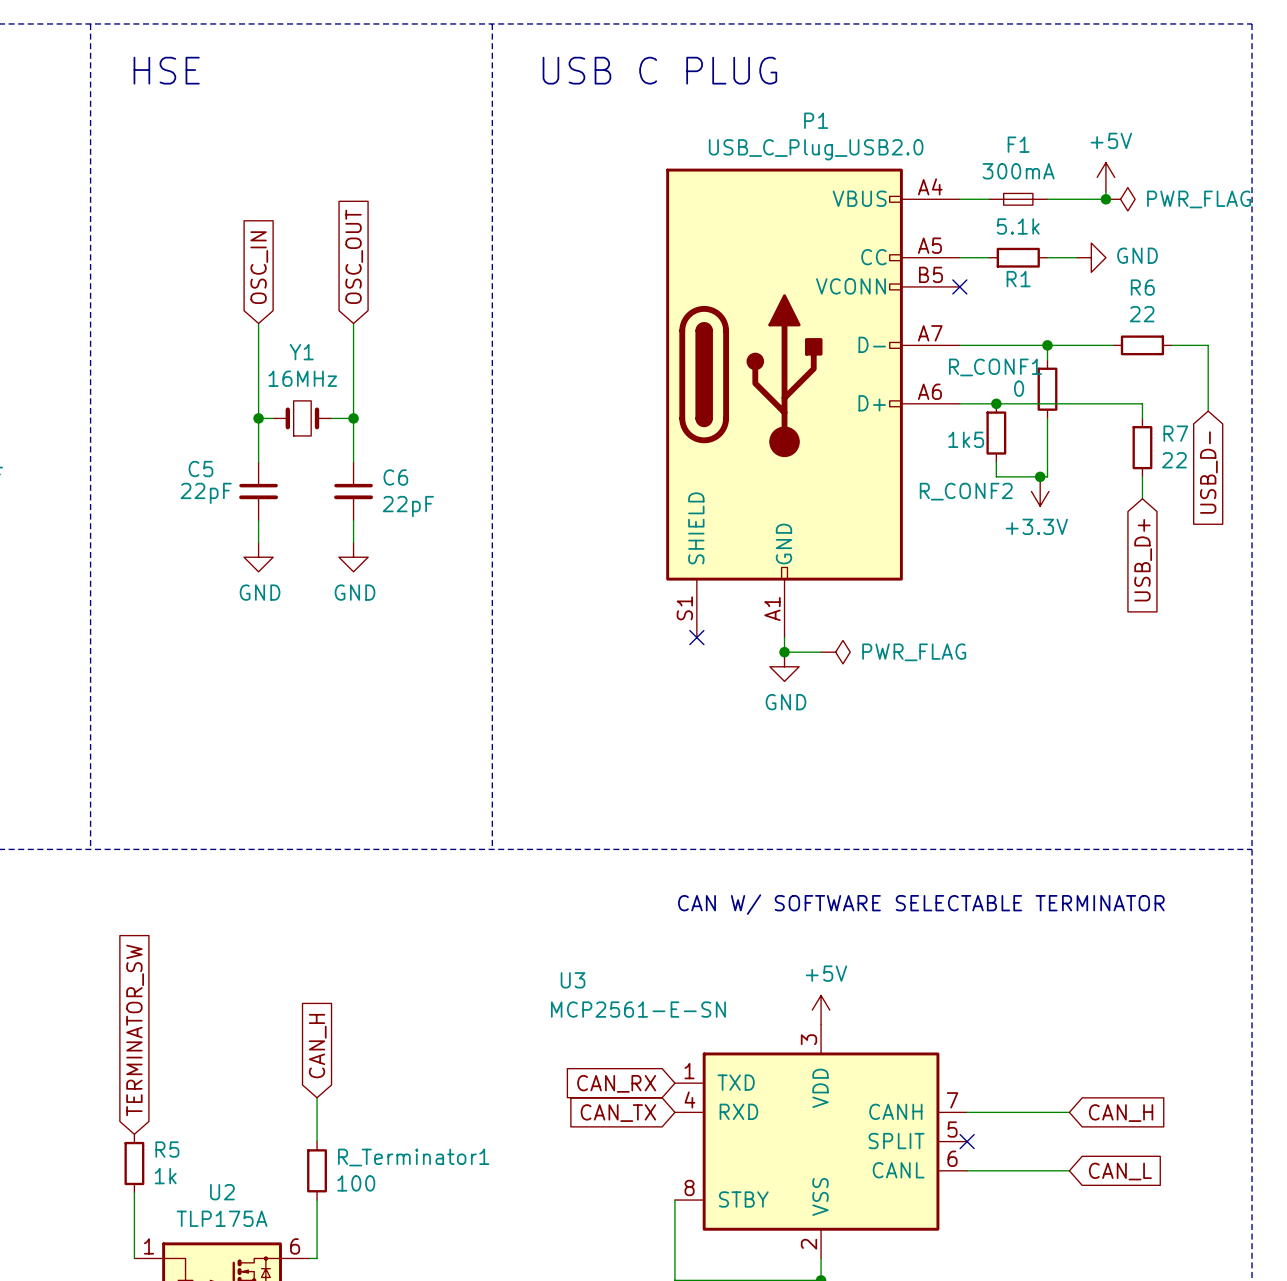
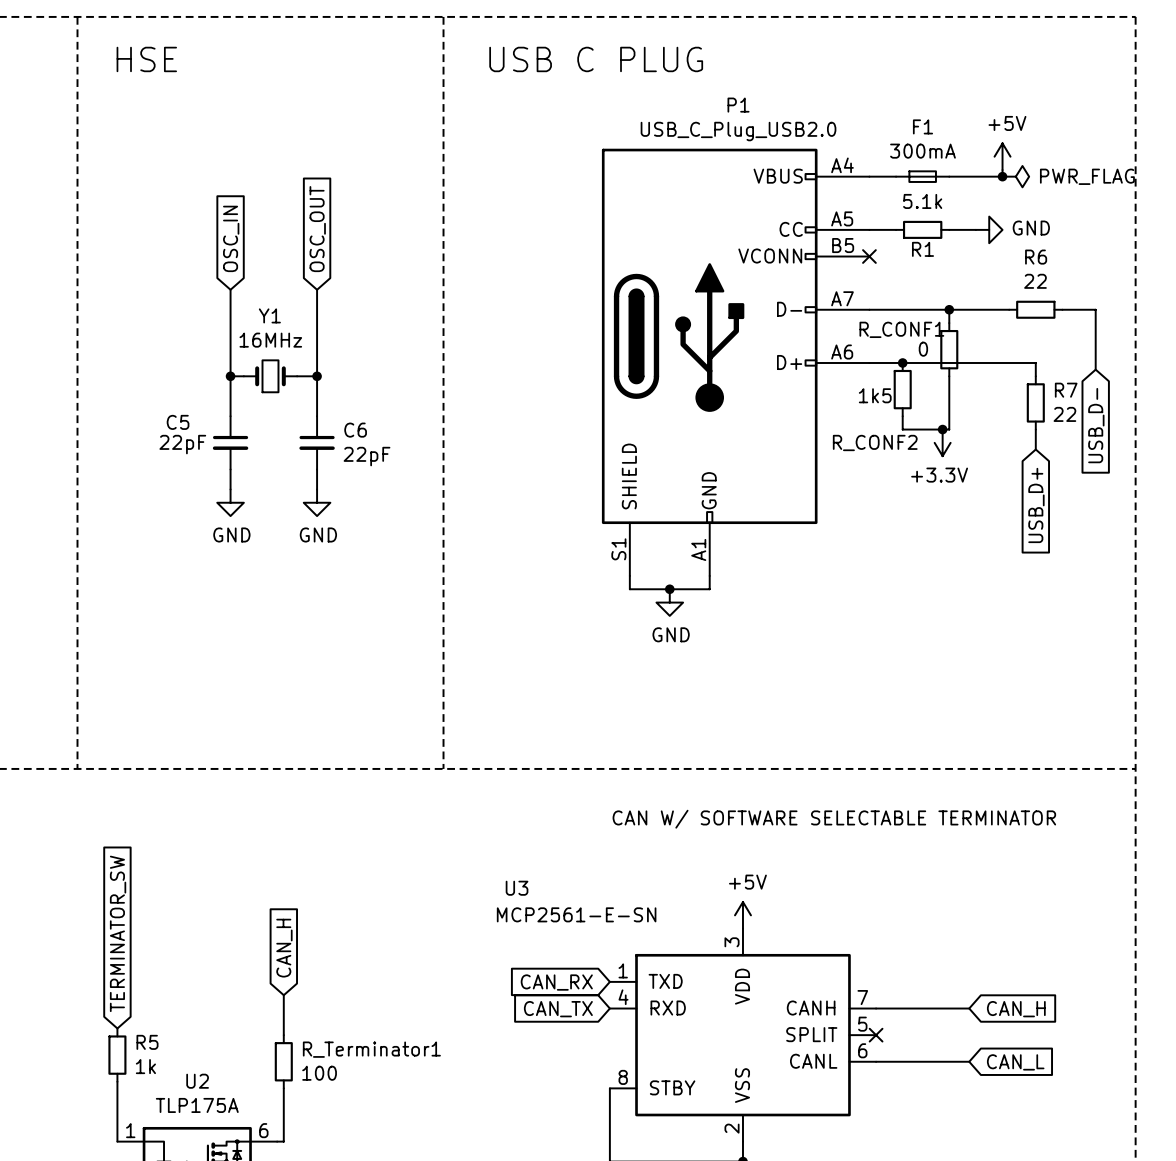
no-connect mark: (696, 637) -> none
wire: (784, 652) (821, 652) -> (709, 589) (629, 589) (629, 575)
junction position: (784, 652) -> (669, 589)
power symbol: PWR_FLAG (835, 652) -> none
power symbol position: GND (784, 666) -> GND (669, 602)

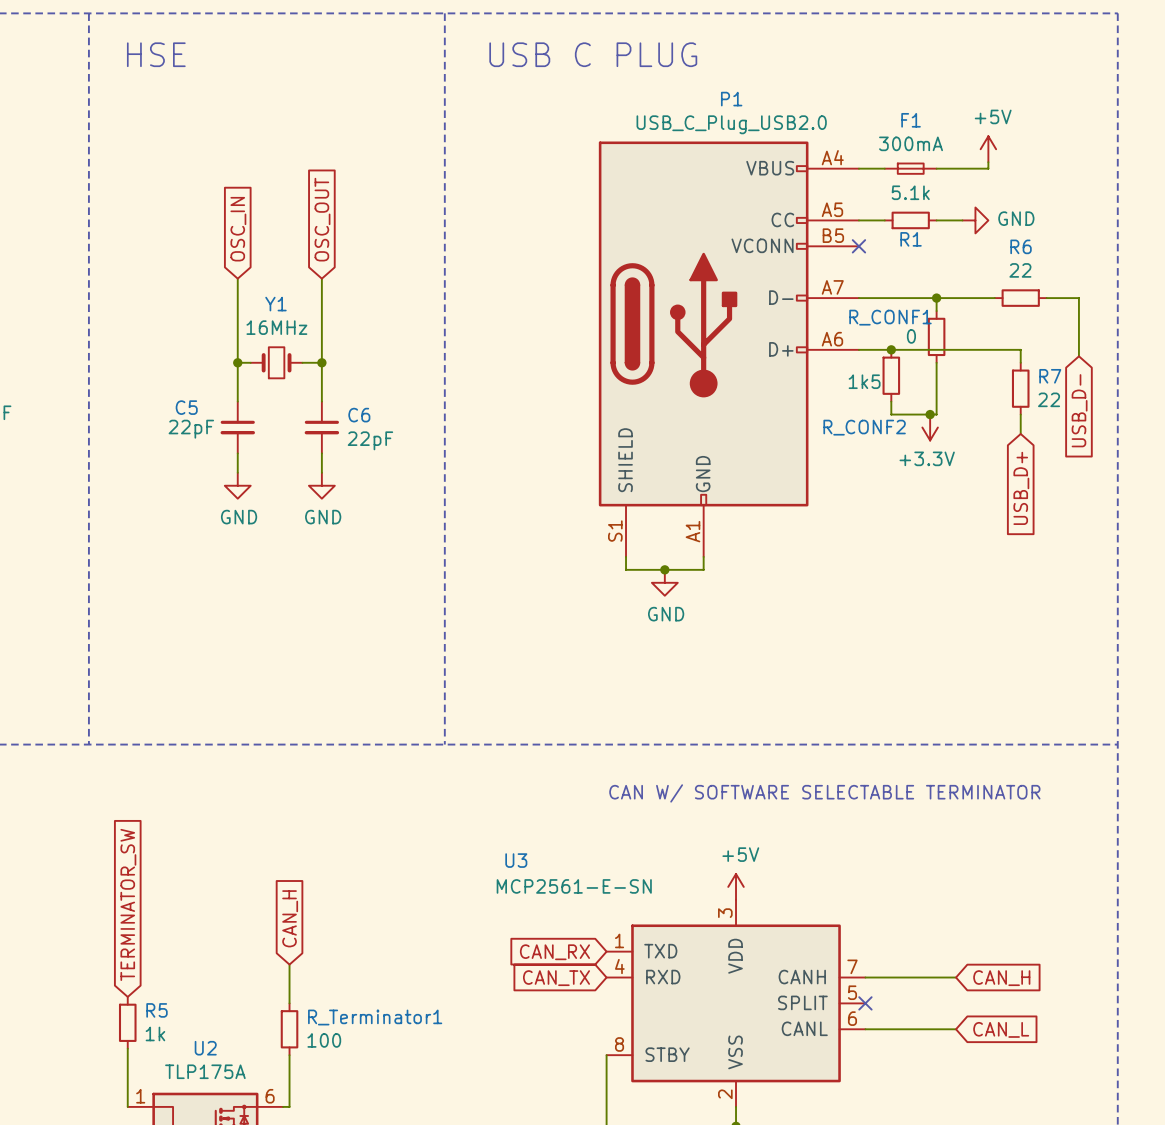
junction: (1002, 176) -> none
power symbol: PWR_FLAG (1015, 176) -> none

